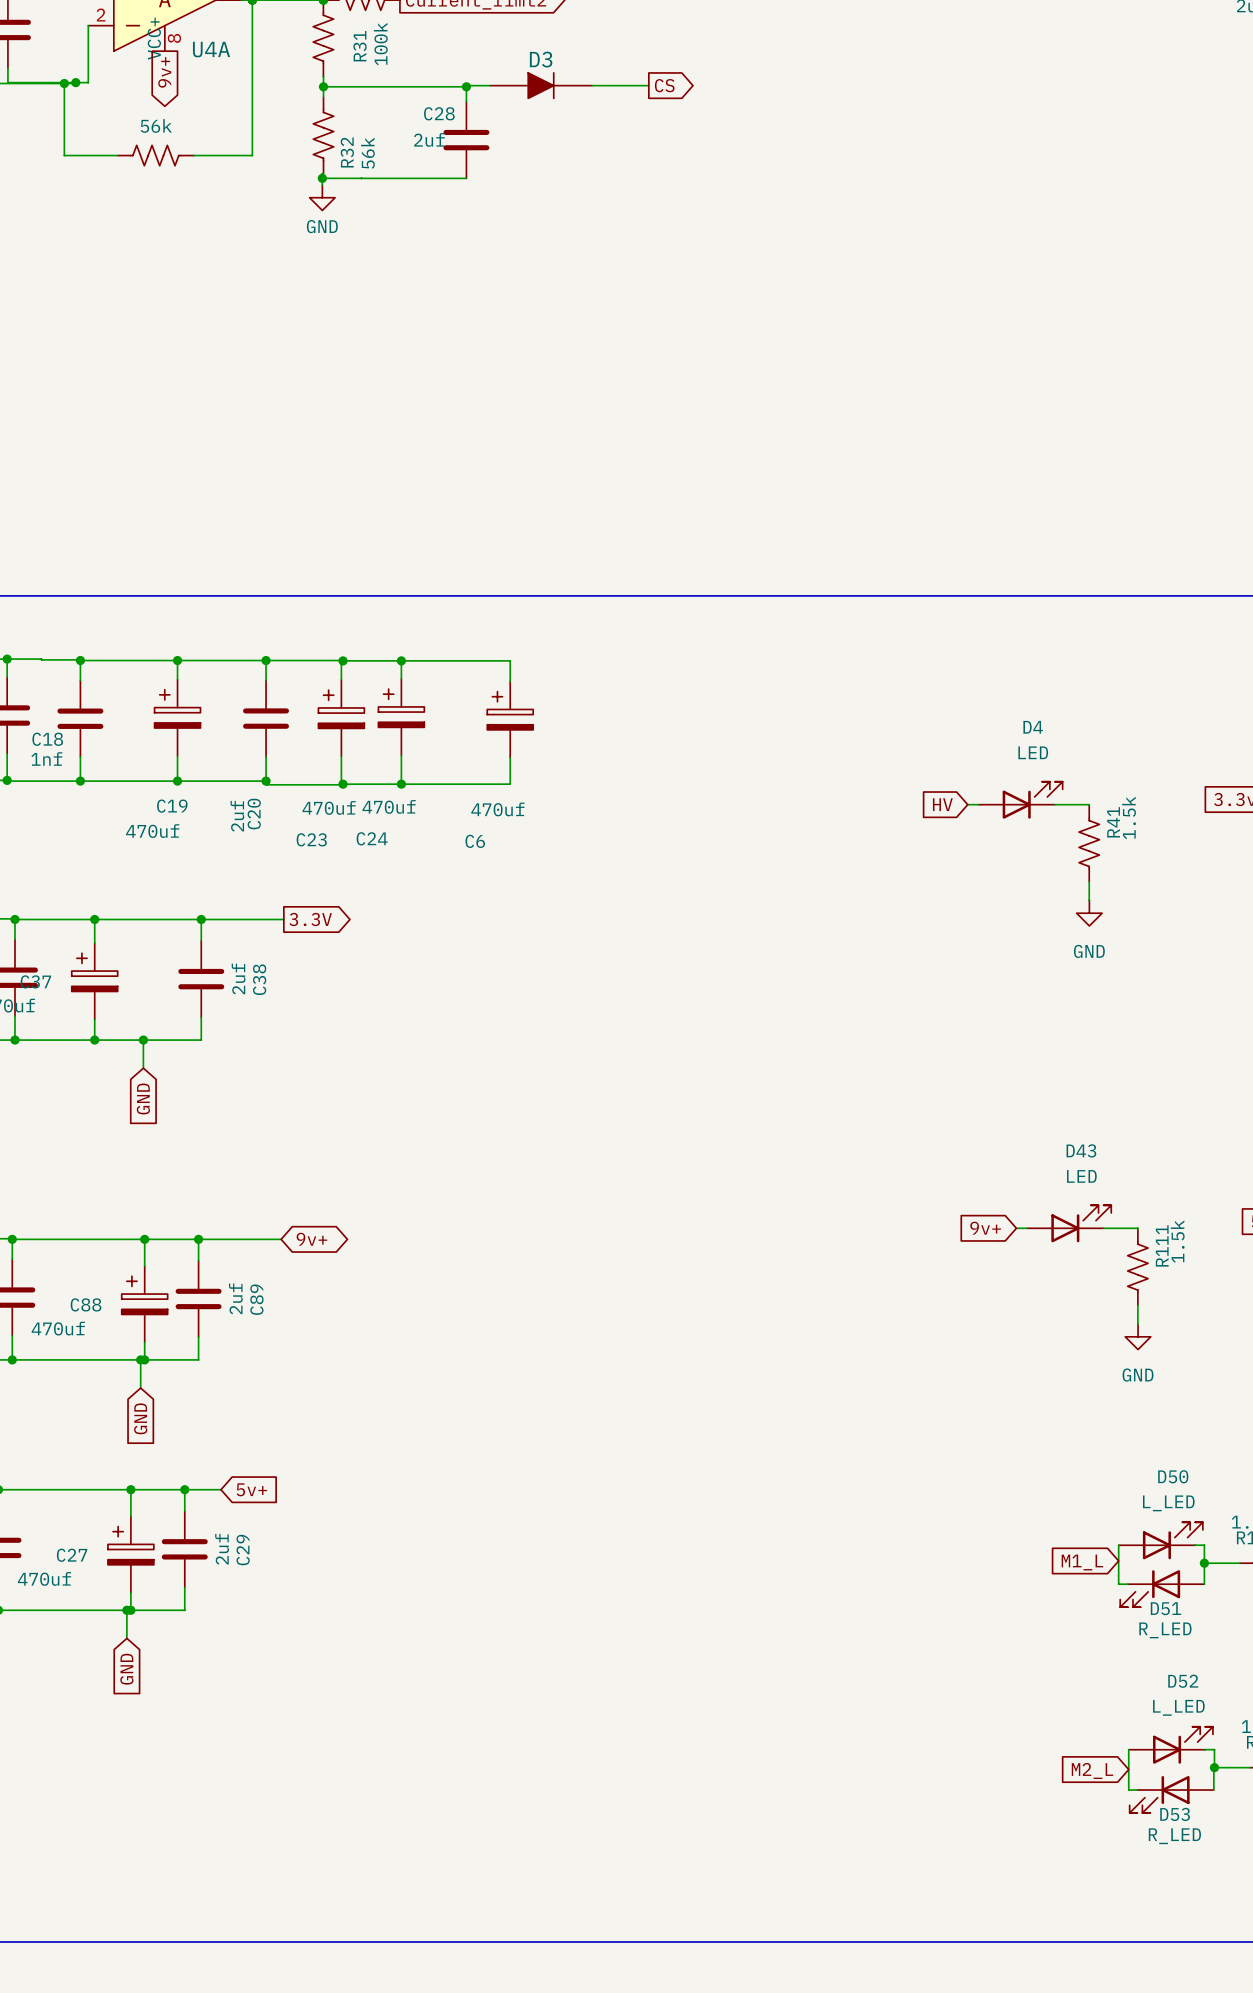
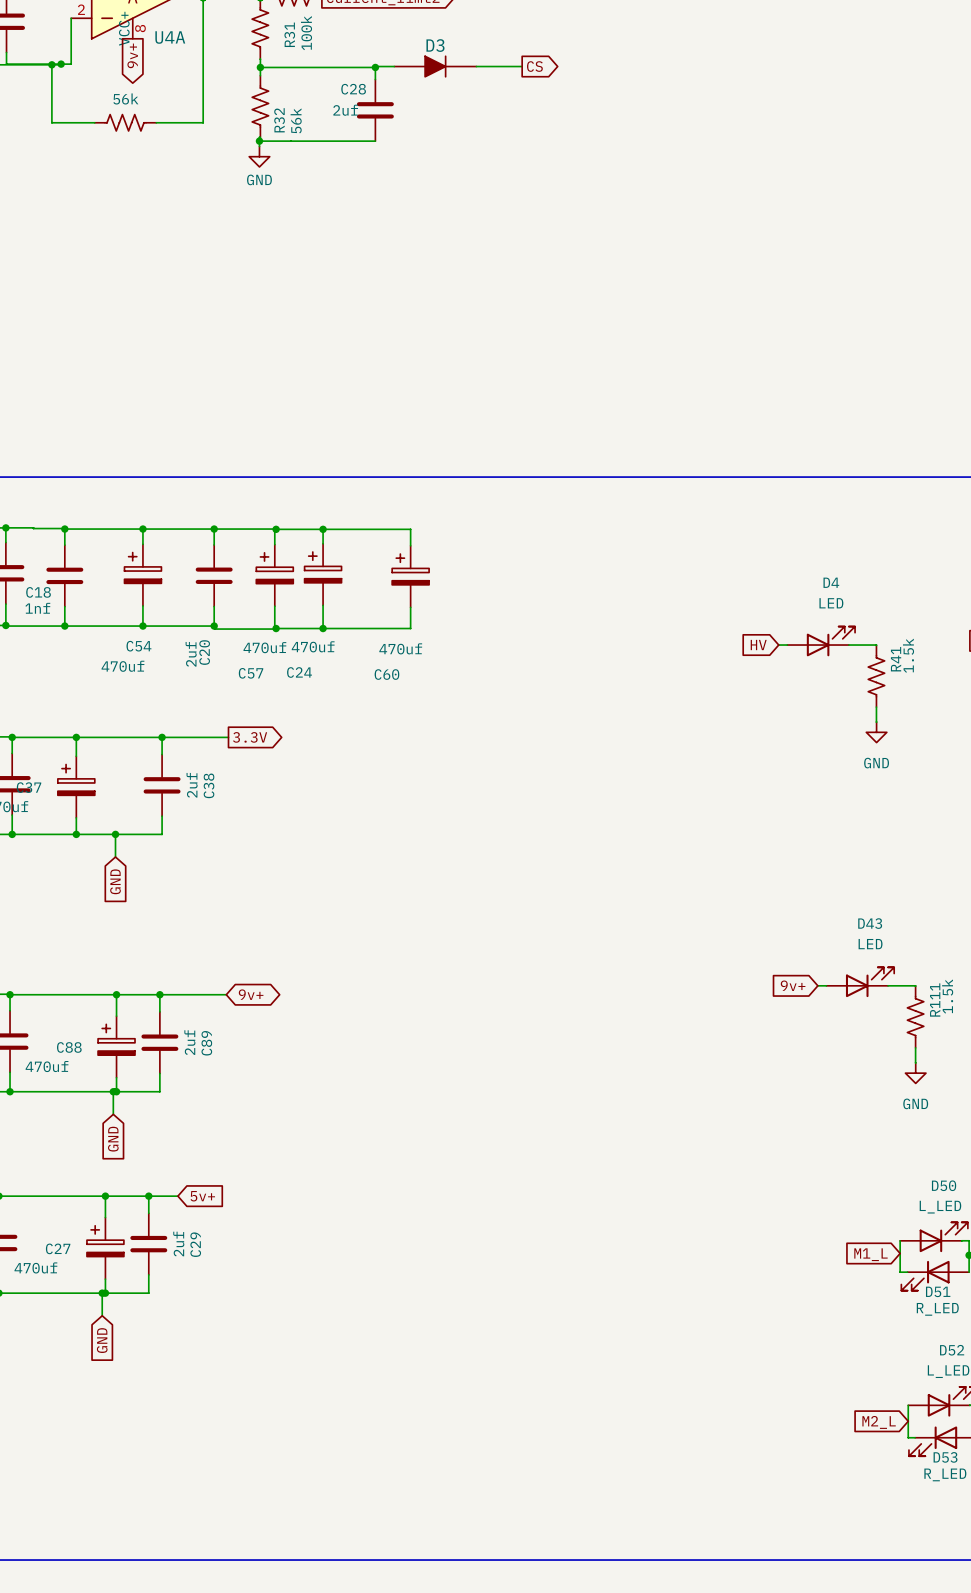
C19 name: C19 (172, 806) -> C54 (138, 646)
C23 name: C23 (311, 839) -> C57 (251, 673)
C6 name: C6 (475, 841) -> C60 (386, 674)

